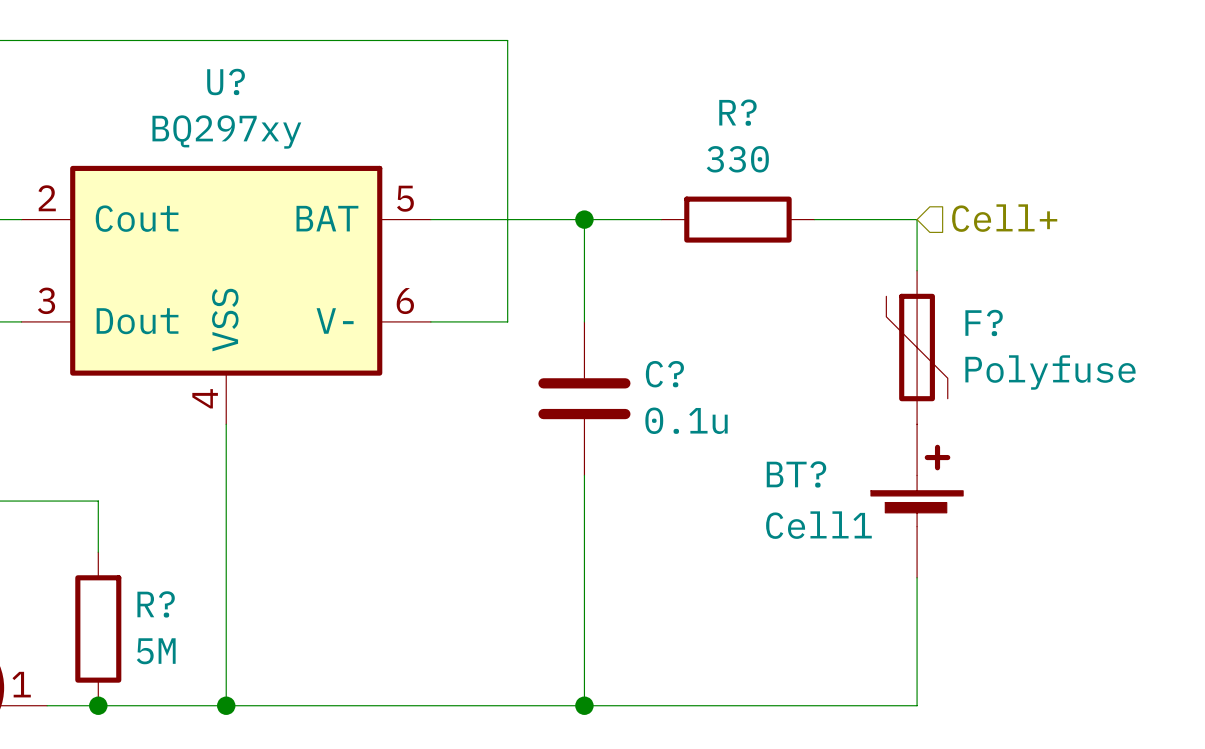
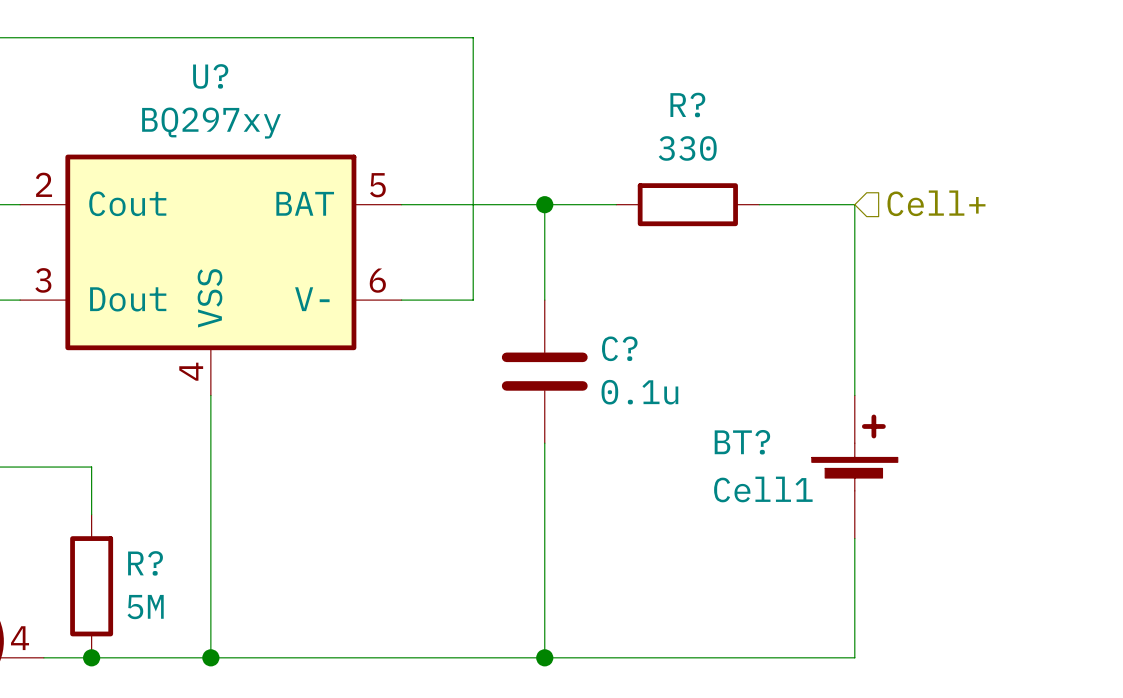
F?: Polyfuse (917, 347) -> none
part pin number: 1 (21, 684) -> 4 (20, 638)

